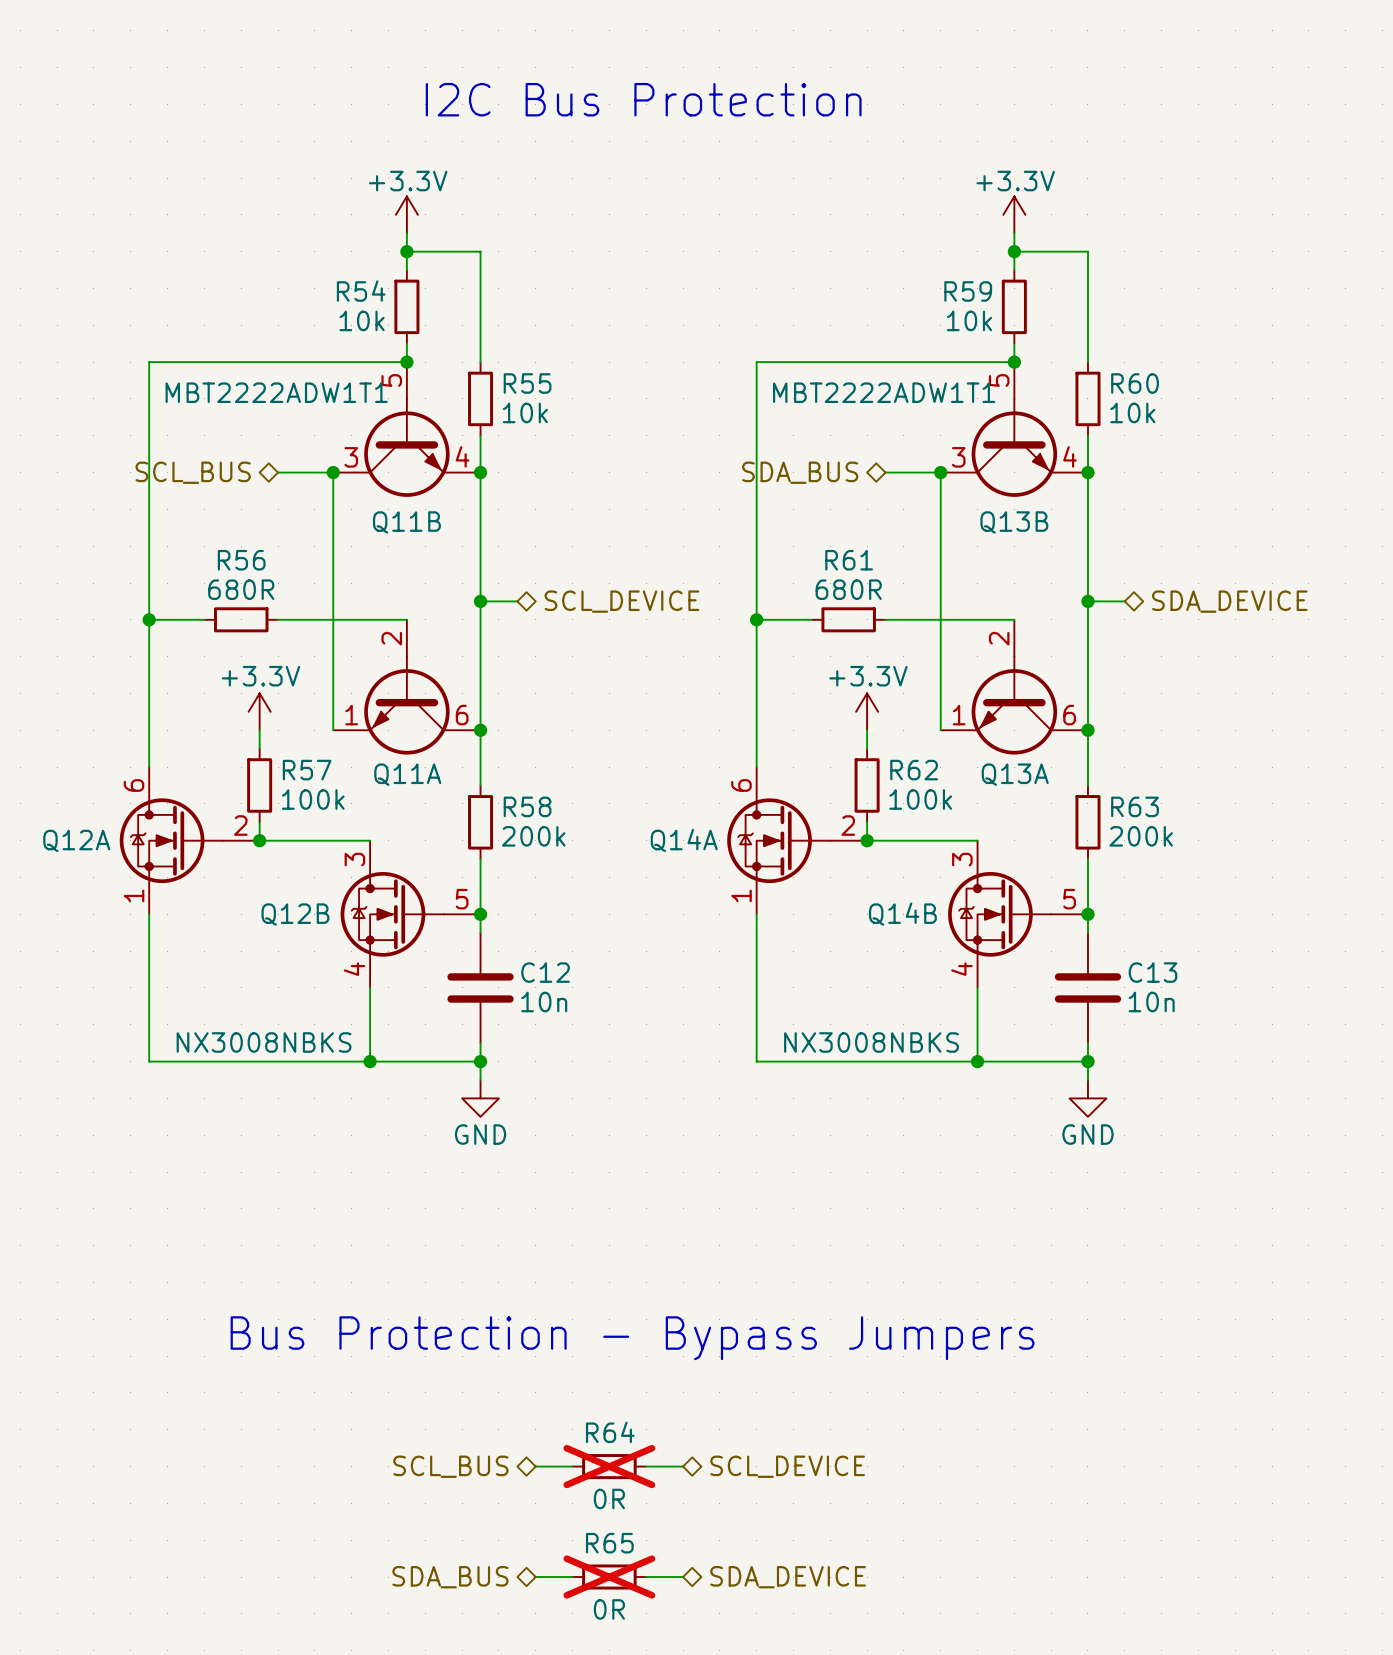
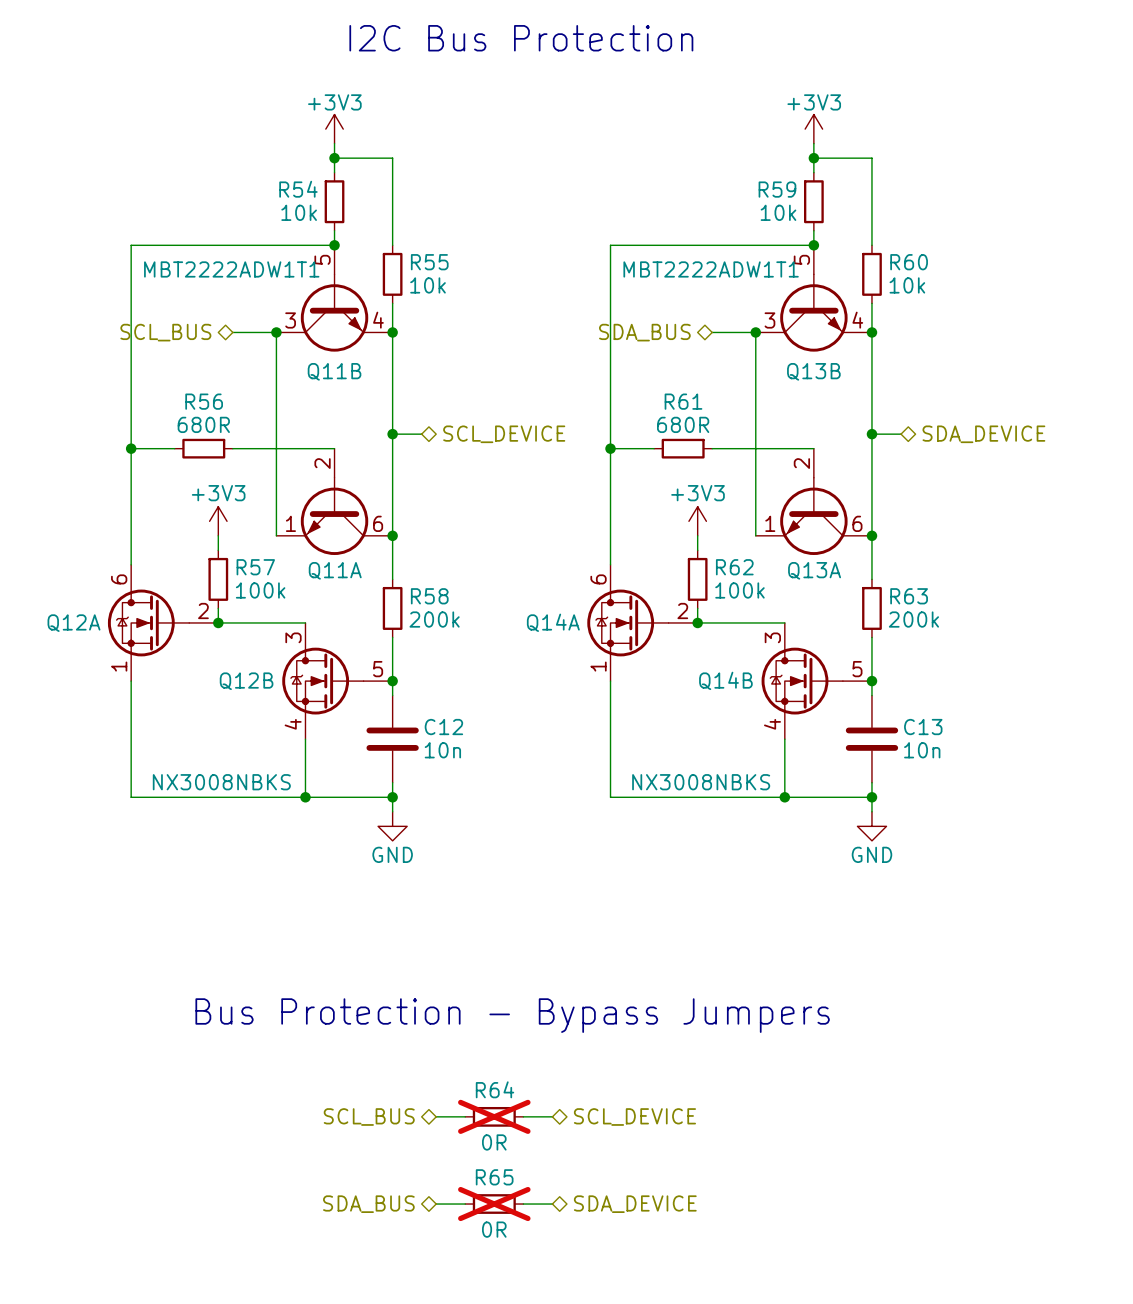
power symbol: +3.3V (406, 214) -> +3V3 (334, 129)
power symbol: +3.3V (1014, 214) -> +3V3 (813, 129)
power symbol: +3.3V (259, 711) -> +3V3 (218, 521)
power symbol: +3.3V (867, 711) -> +3V3 (697, 521)

